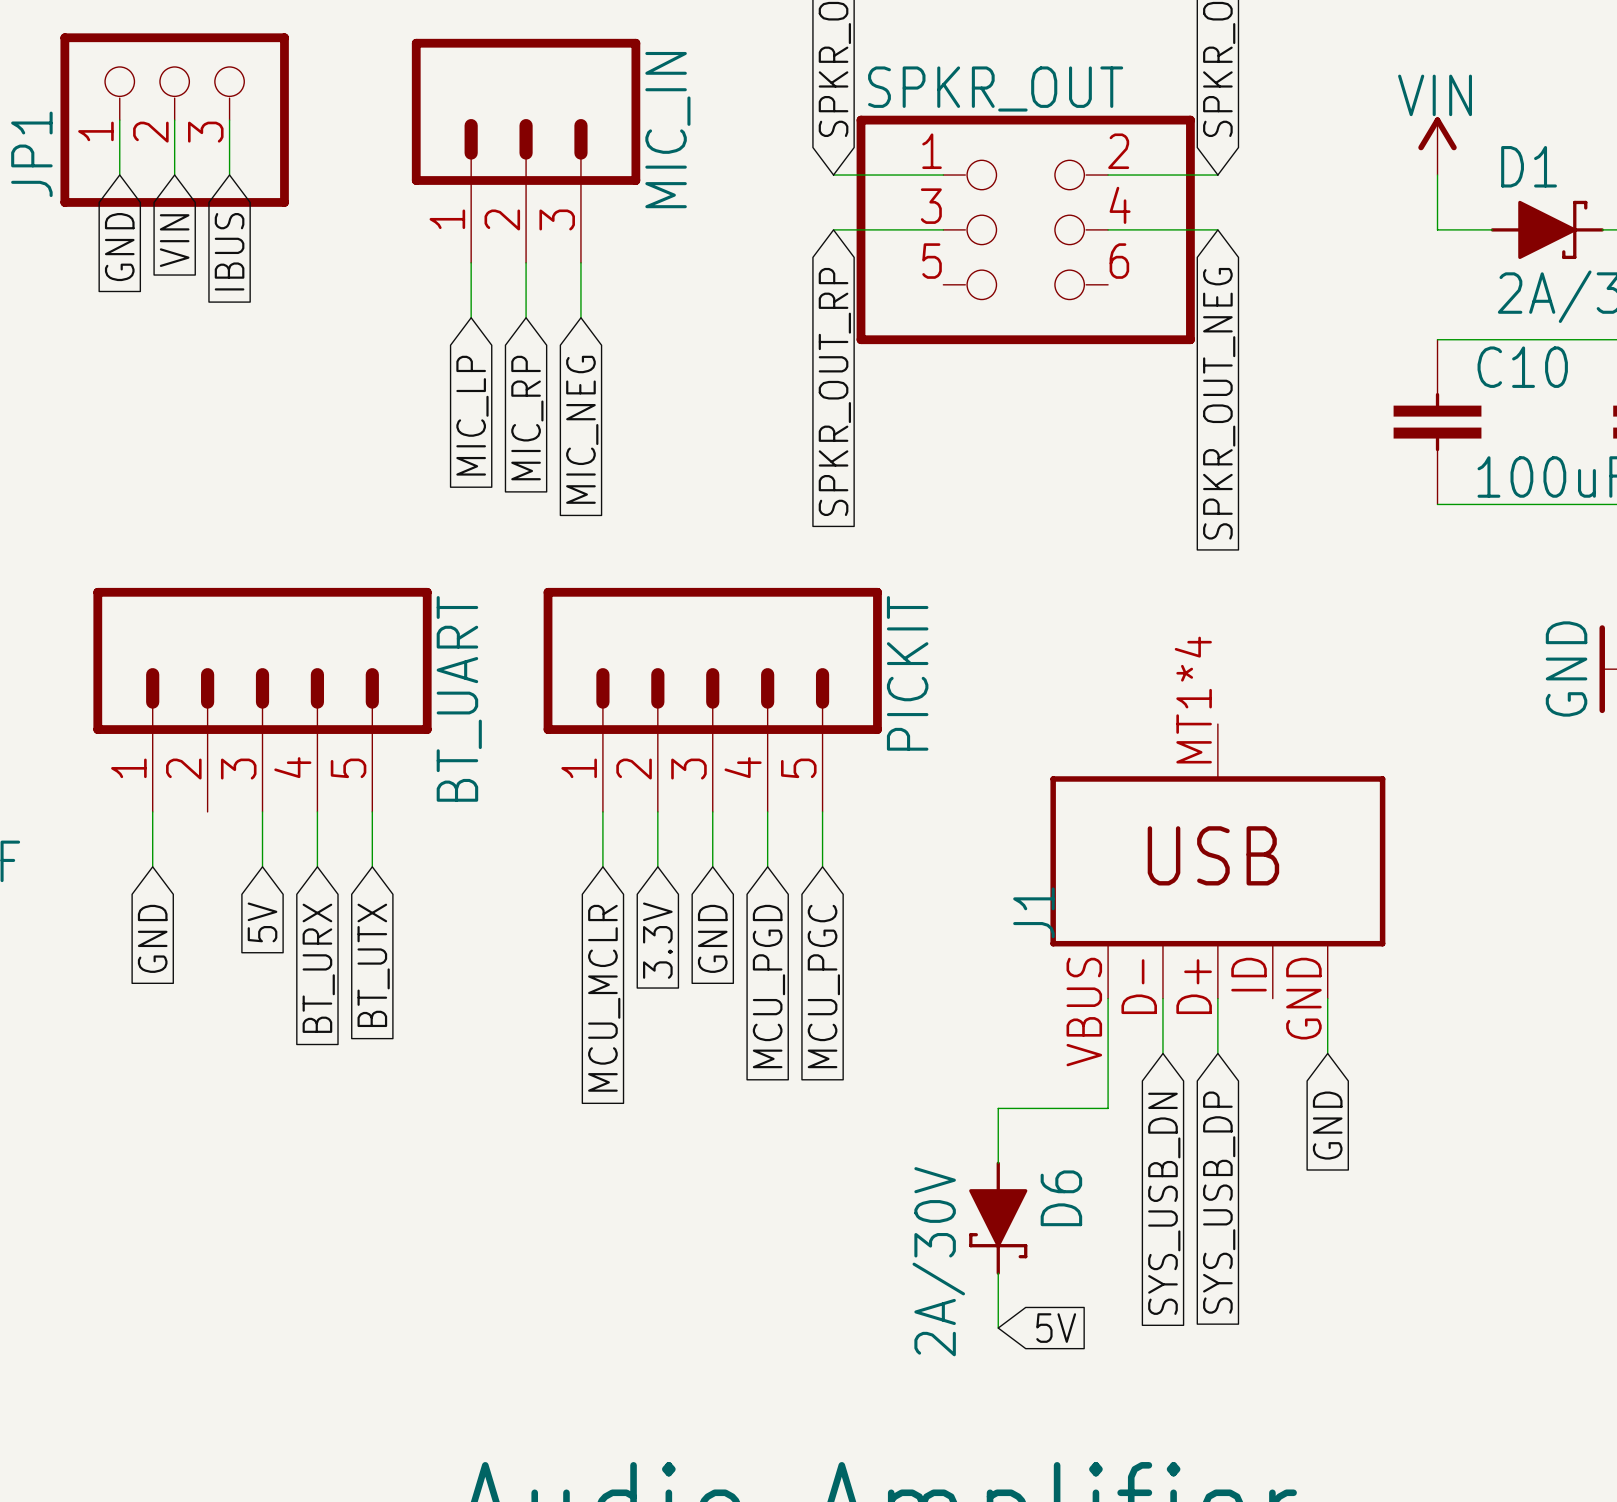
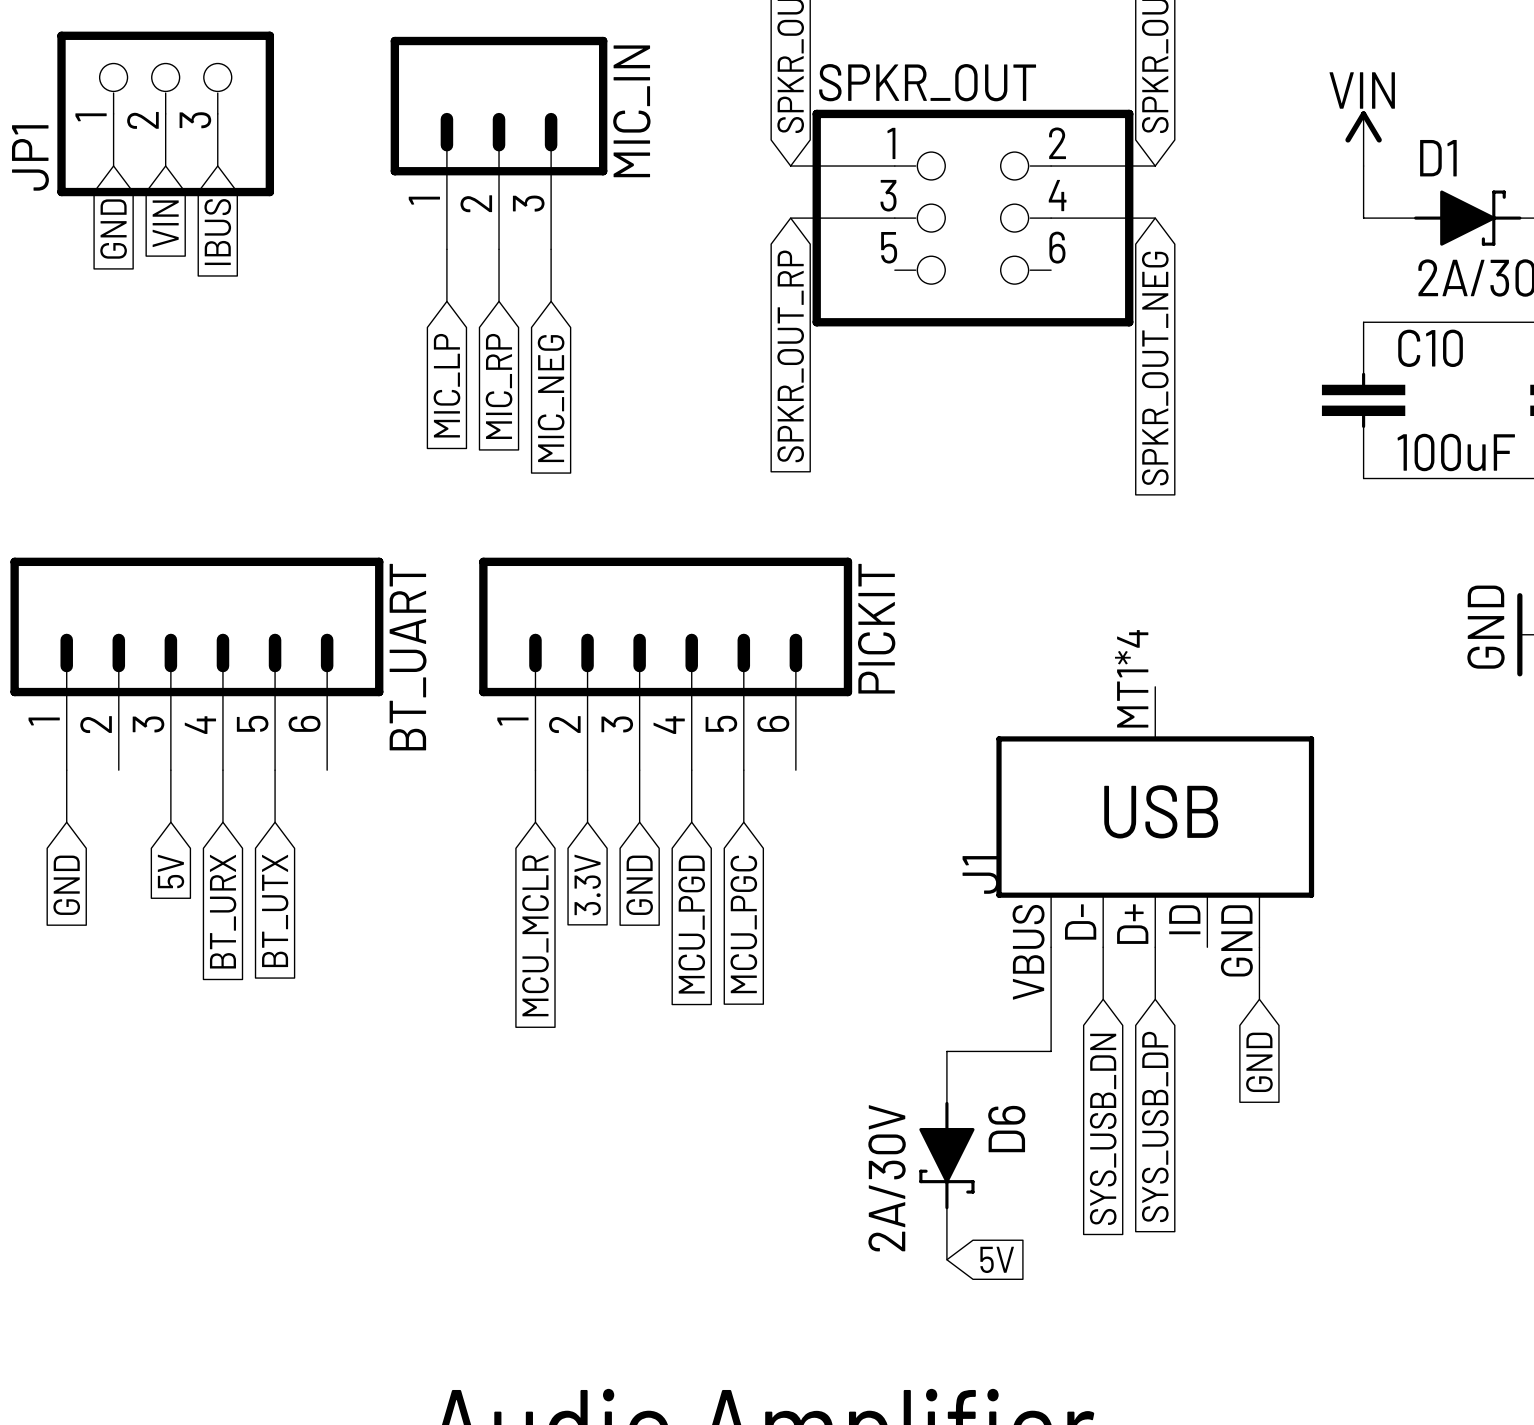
PICKIT symbol: [543, 587, 882, 812] -> [479, 557, 853, 771]
BT_UART: none -> (196, 663)
BT_UART: (262, 699) -> none
wire: (152, 811) (152, 866) -> (66, 770) (66, 822)
wire: (262, 811) (262, 866) -> (170, 770) (170, 822)
wire: (317, 811) (317, 866) -> (222, 770) (222, 822)
wire: (372, 811) (372, 866) -> (275, 770) (275, 822)
wire: (602, 811) (602, 866) -> (535, 770) (535, 822)
wire: (657, 811) (657, 866) -> (587, 770) (587, 822)
wire: (712, 811) (712, 866) -> (639, 770) (639, 822)
wire: (767, 811) (767, 866) -> (691, 770) (691, 822)
wire: (822, 811) (822, 866) -> (743, 770) (743, 822)
global label position: 5V (262, 922) -> 5V (171, 871)
global label position: GND (152, 938) -> GND (66, 885)
global label position: GND (712, 938) -> GND (639, 885)
global label position: 3.3V (657, 940) -> 3.3V (587, 884)
global label position: BT_UTX (373, 965) -> BT_UTX (275, 910)
global label position: BT_URX (318, 968) -> BT_URX (223, 911)
global label position: MCU_PGD (768, 986) -> MCU_PGD (691, 924)
global label position: MCU_PGC (823, 986) -> MCU_PGC (743, 924)
global label position: MCU_MCLR (604, 998) -> MCU_MCLR (535, 935)

